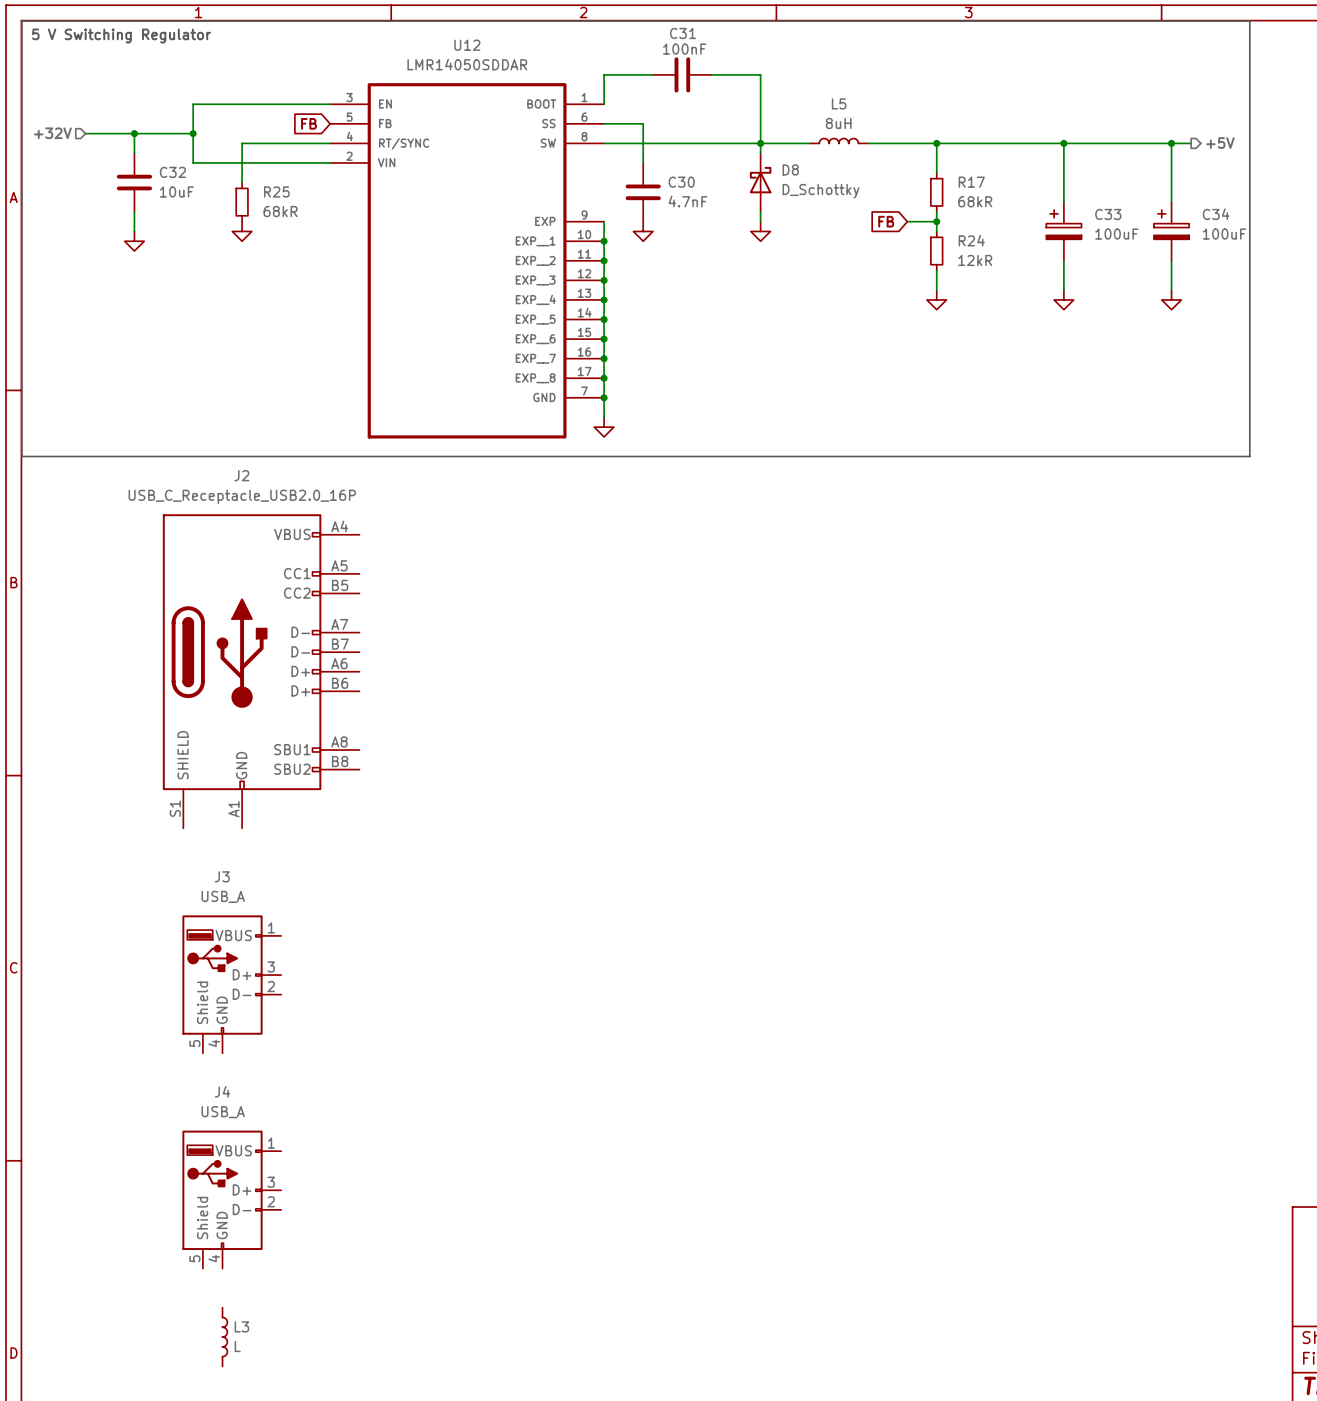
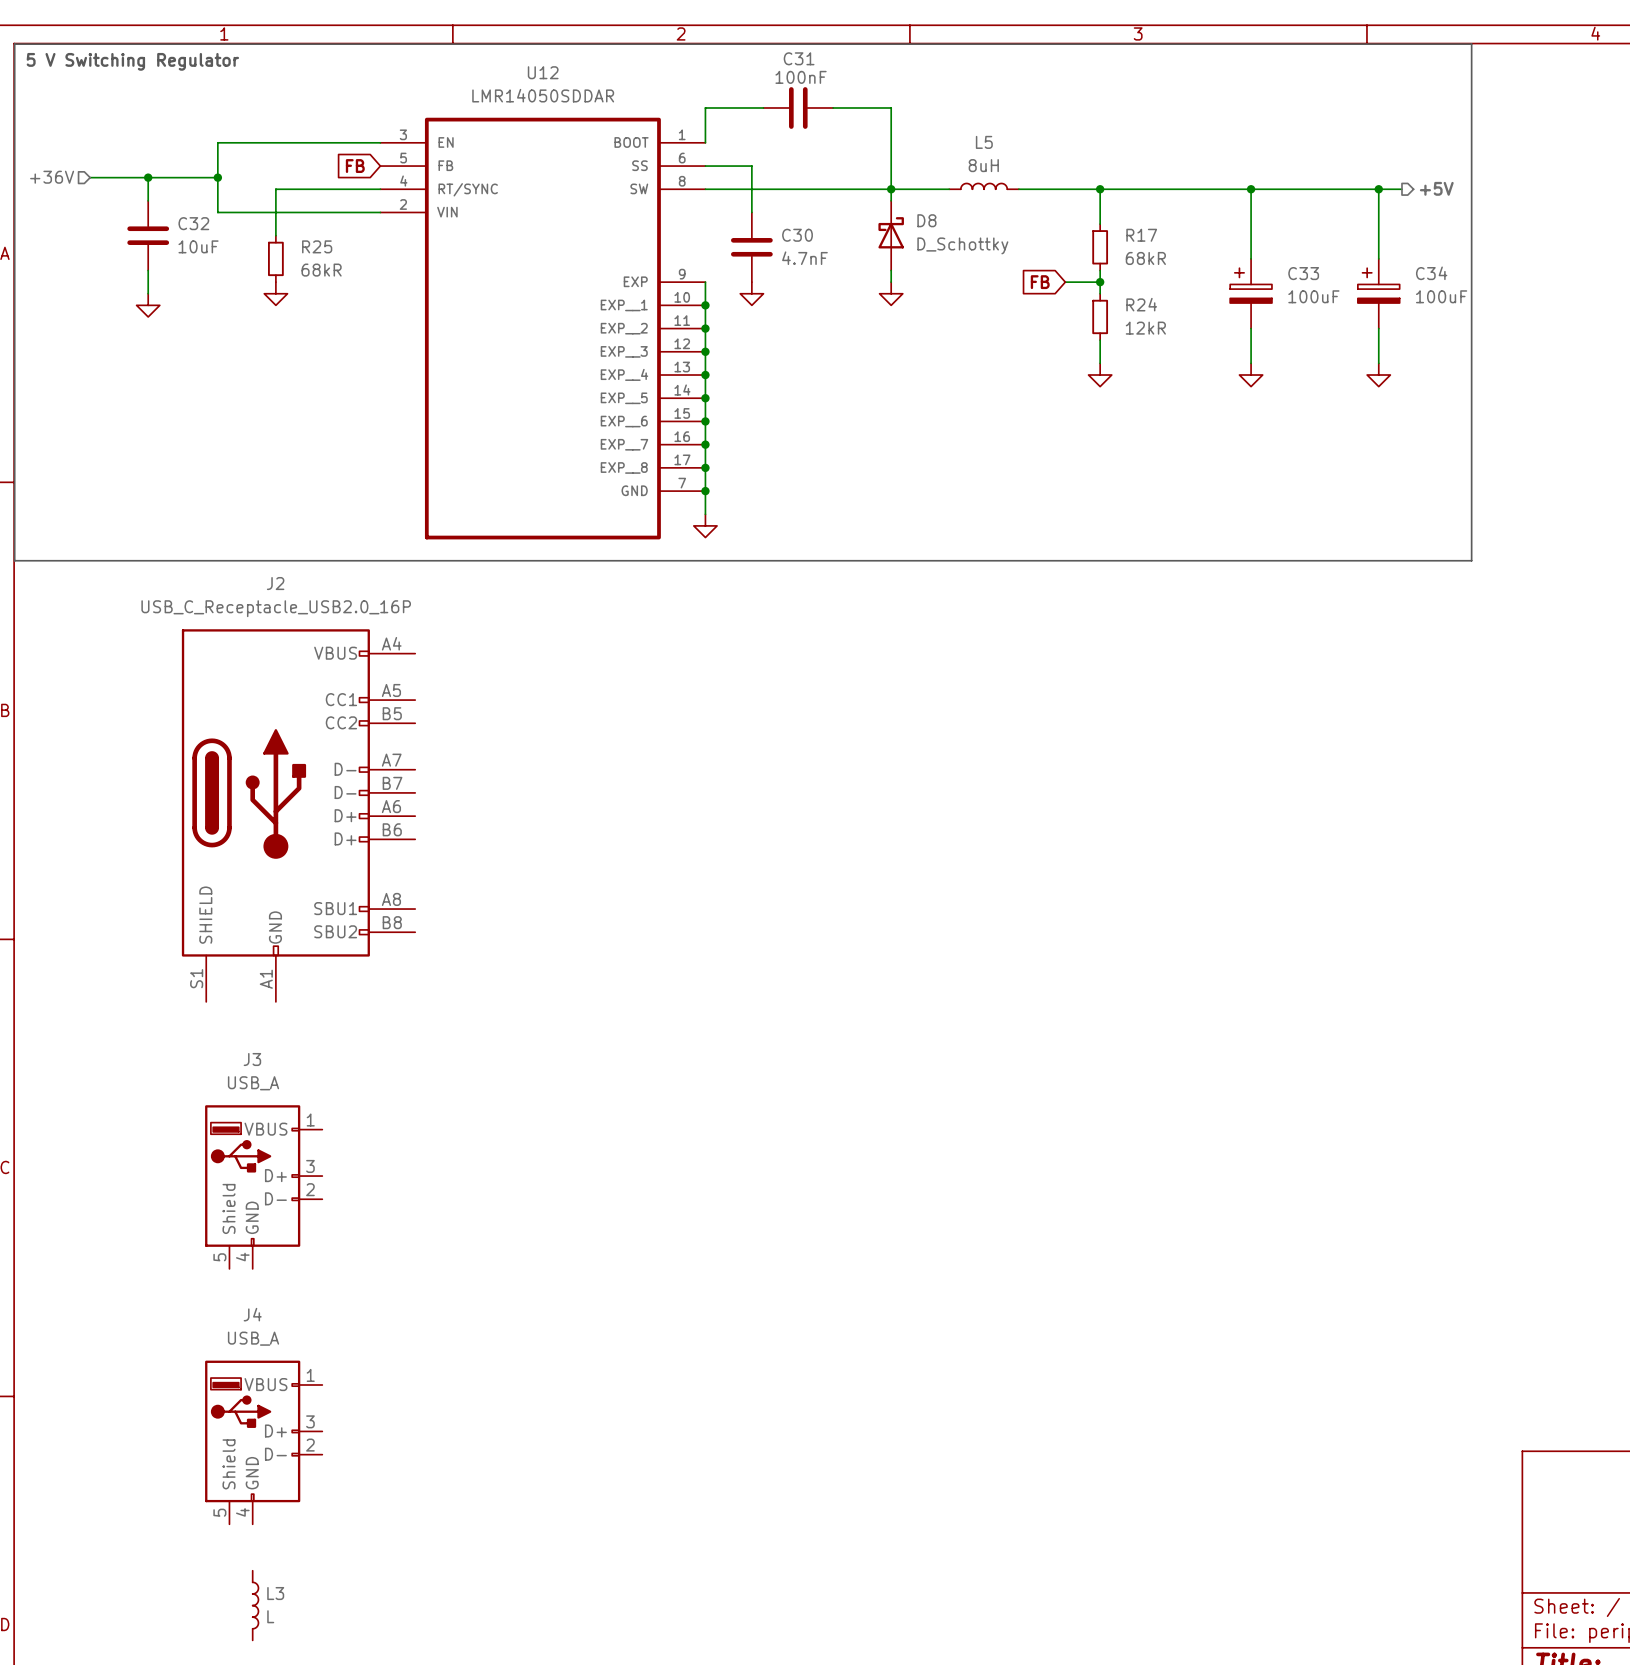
hierarchical label: +32V (52, 133) -> +36V (52, 177)

